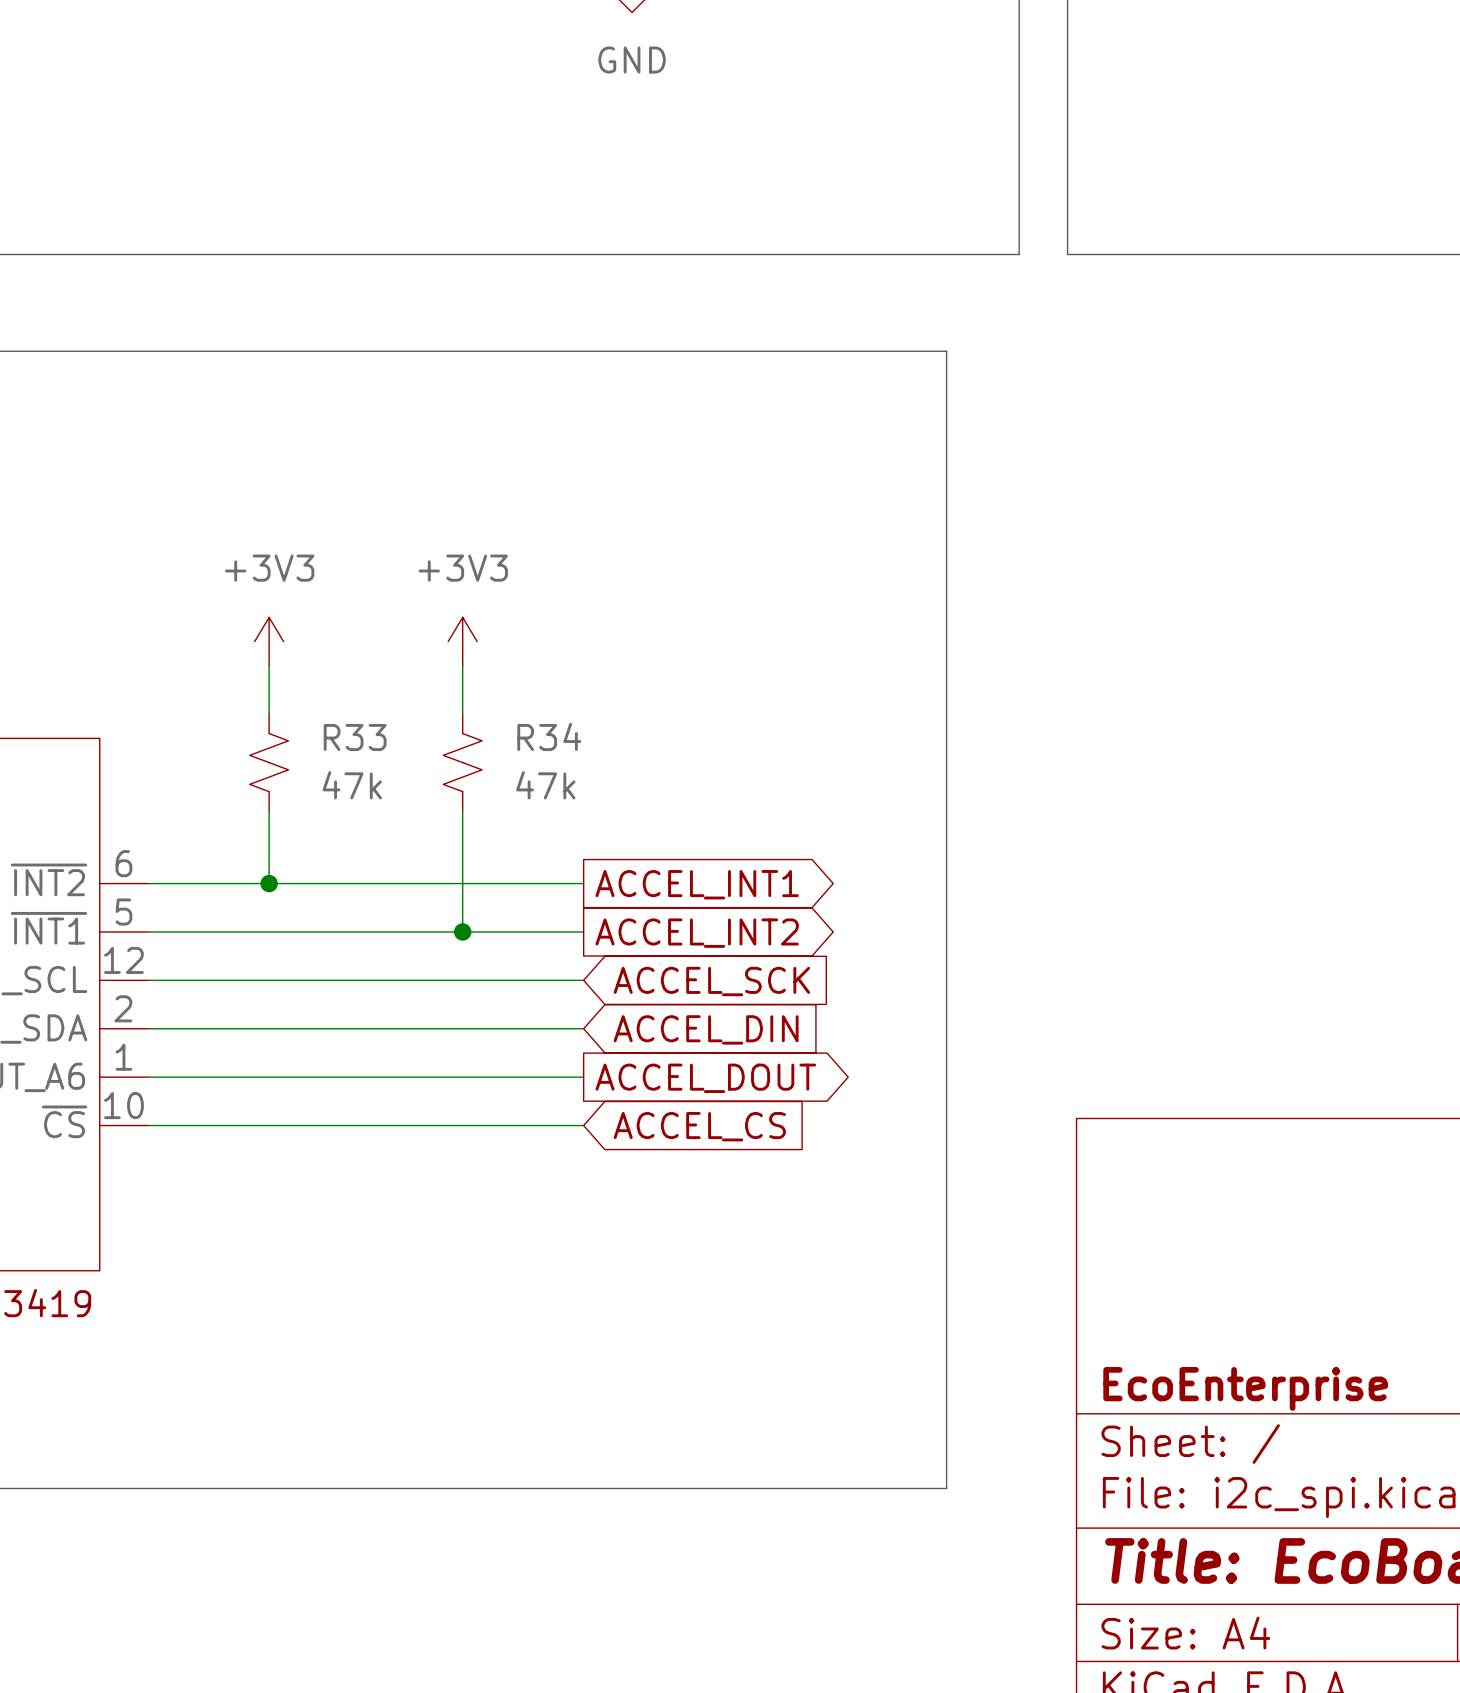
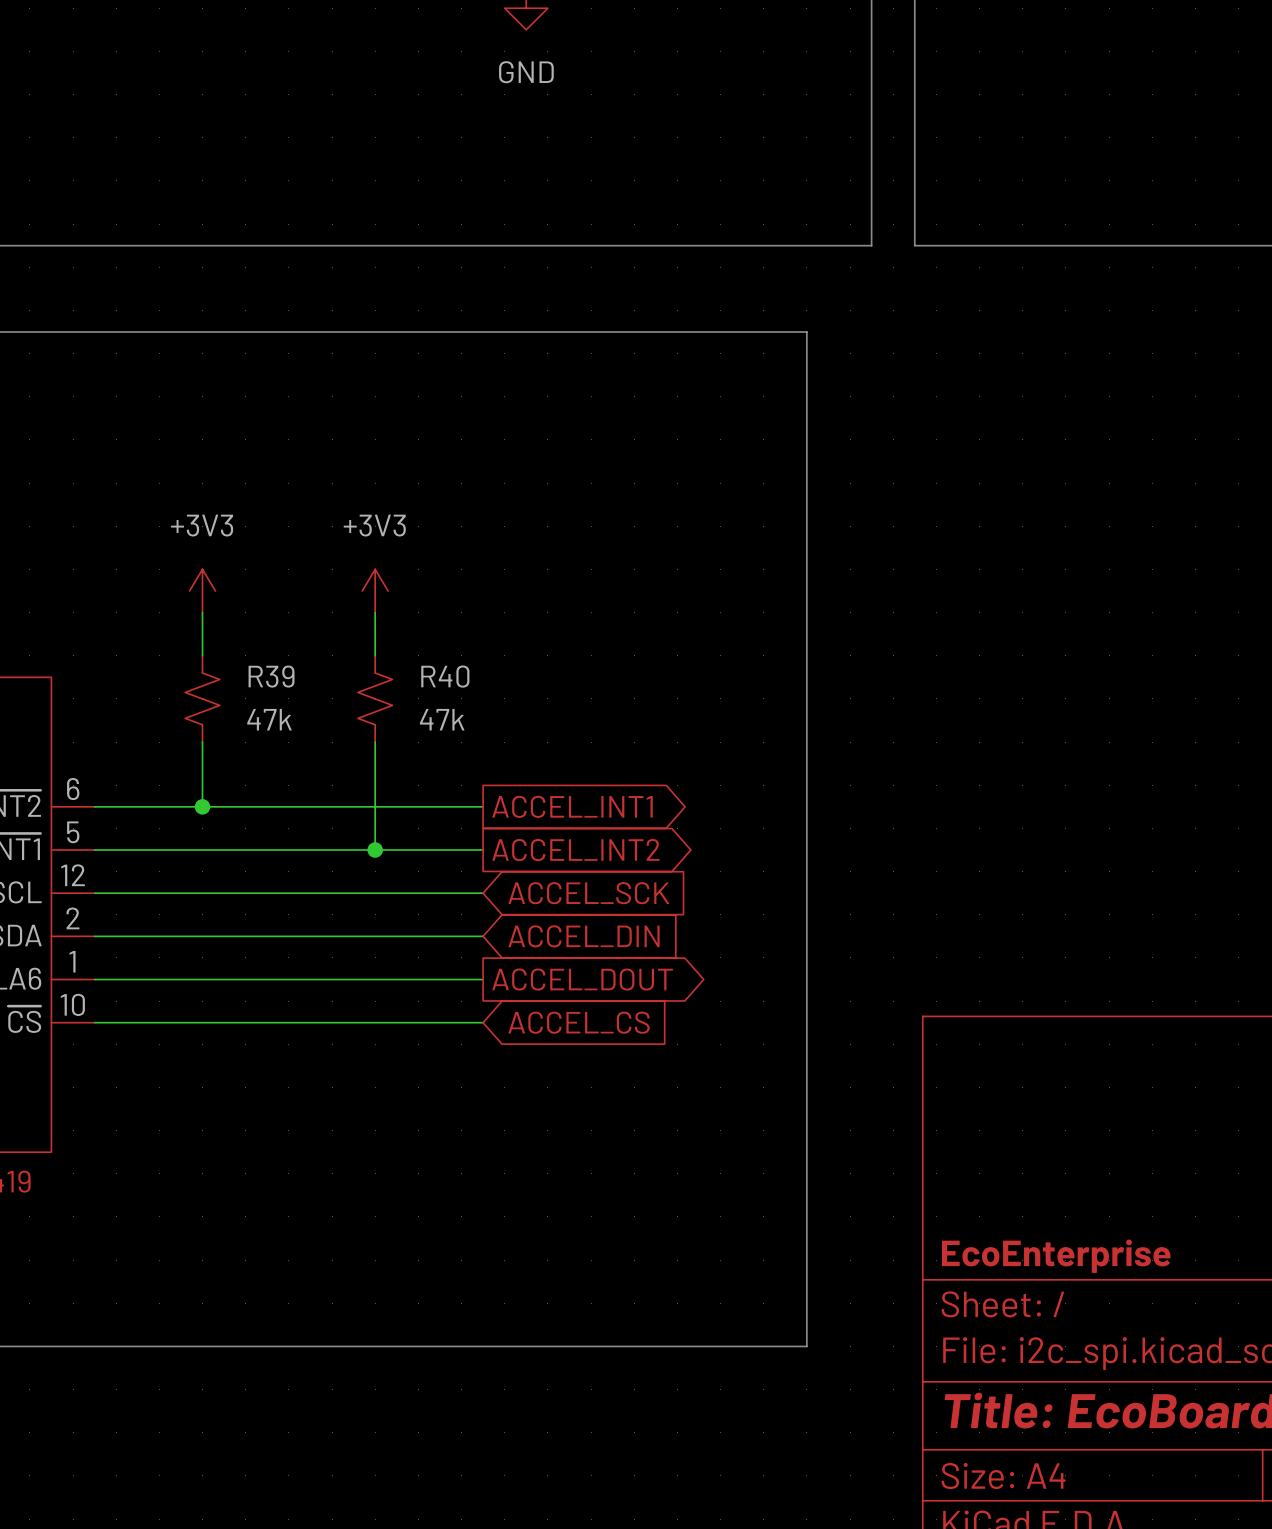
R34 name: R34 (549, 736) -> R40 (445, 676)
R33 name: R33 (355, 737) -> R39 (271, 676)

